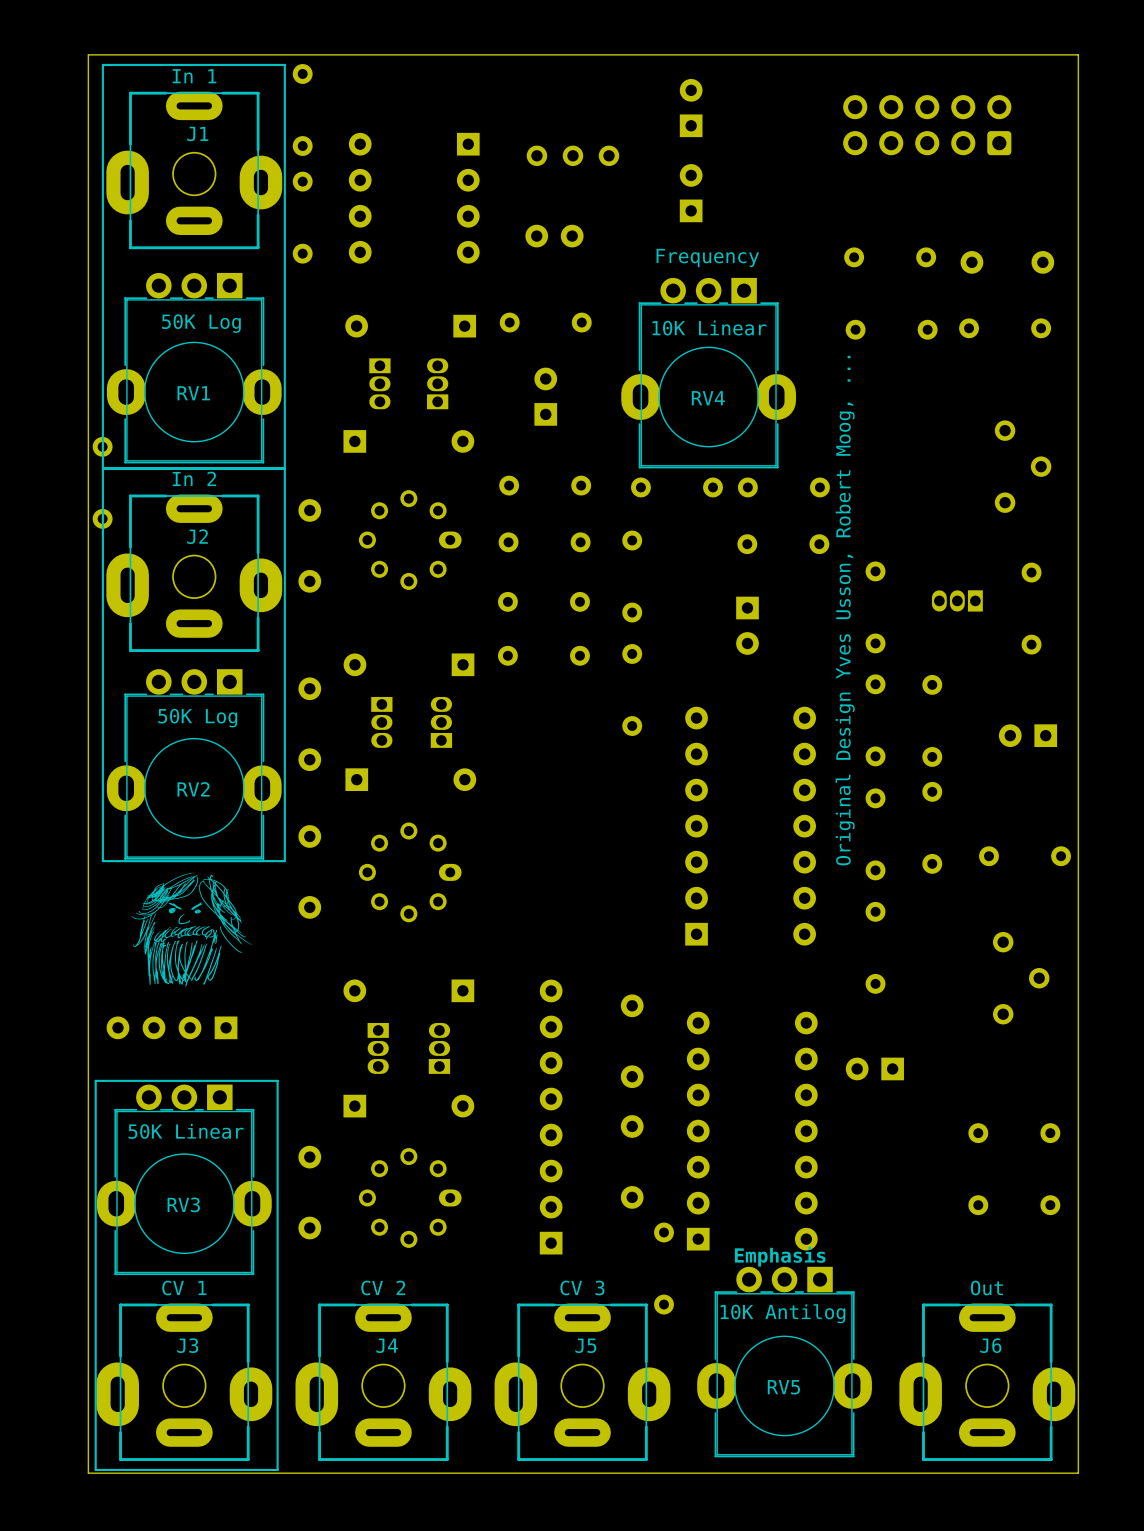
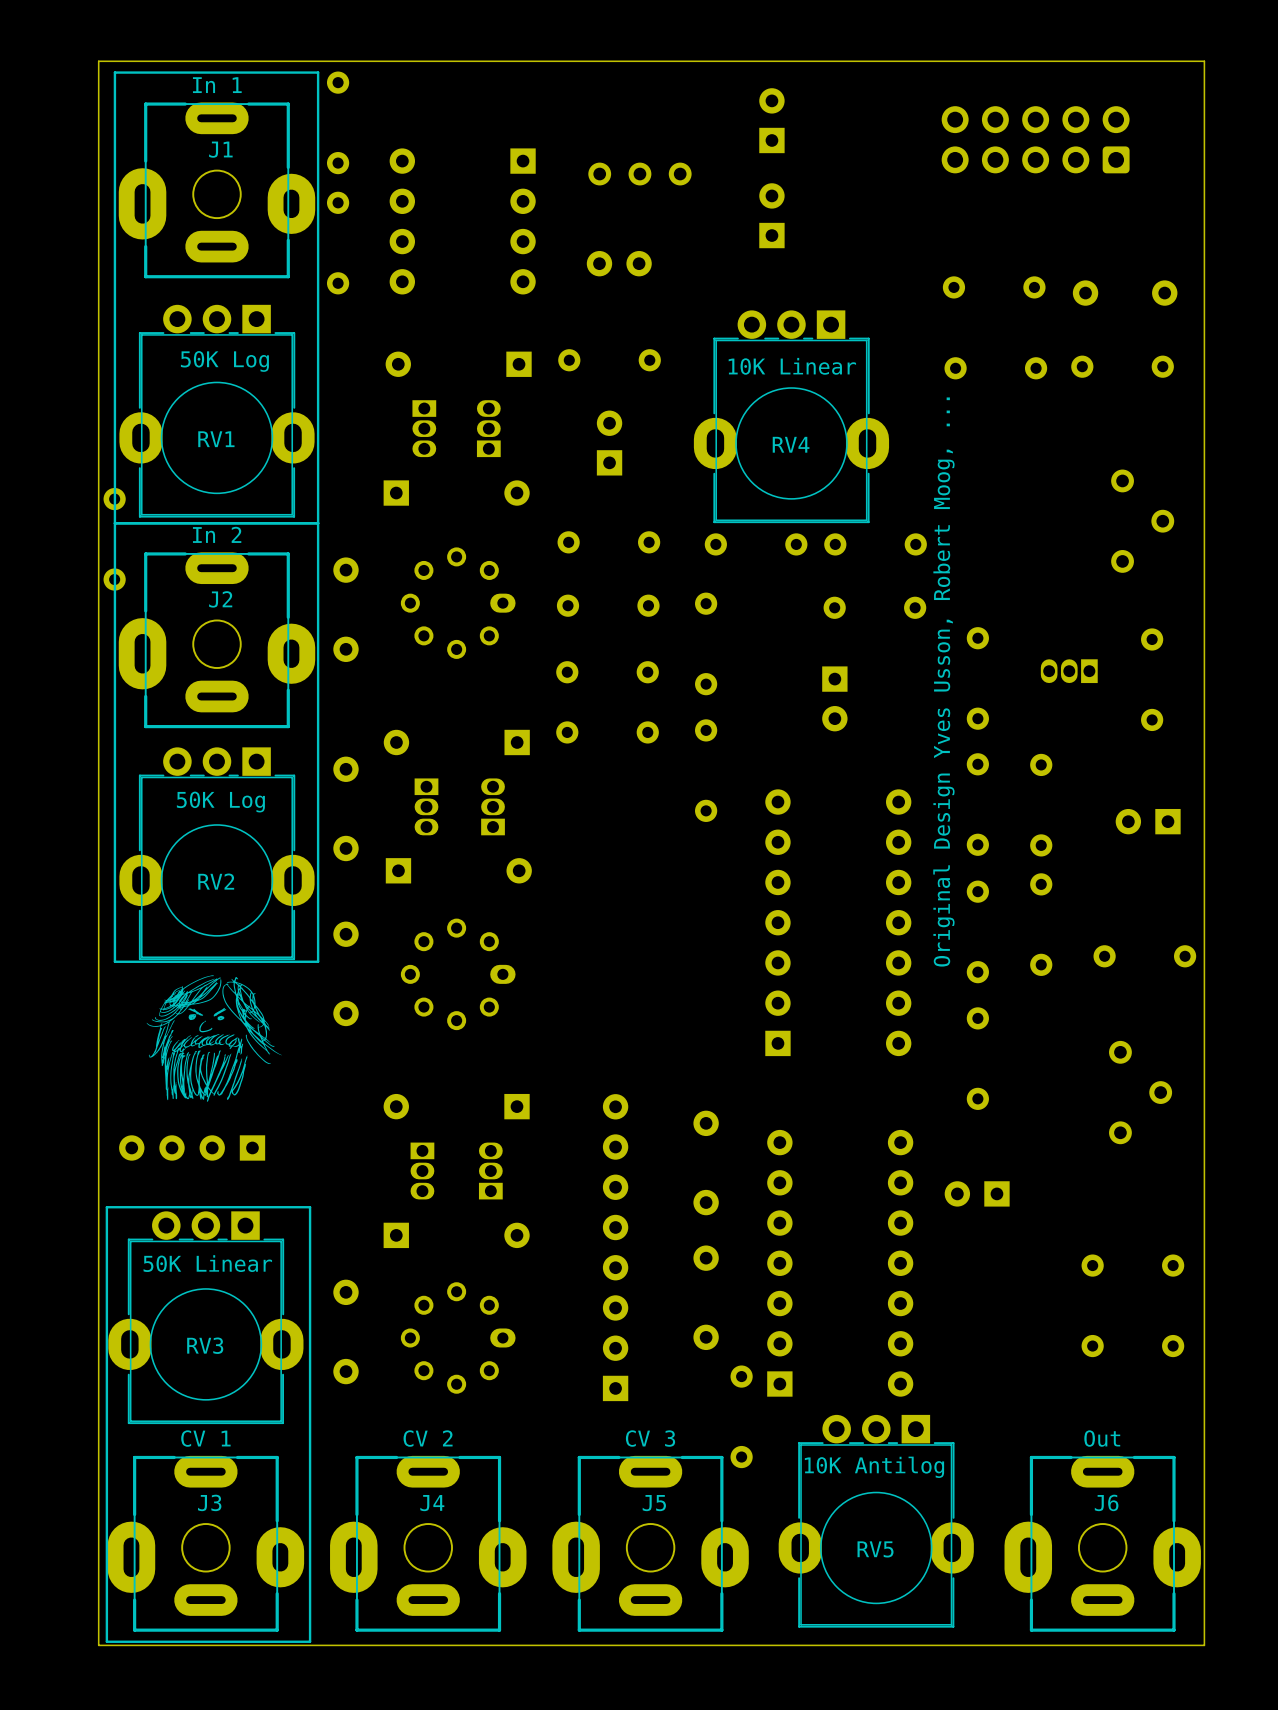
text: Frequency (707, 257) -> none
text: Emphasis (780, 1256) -> none

